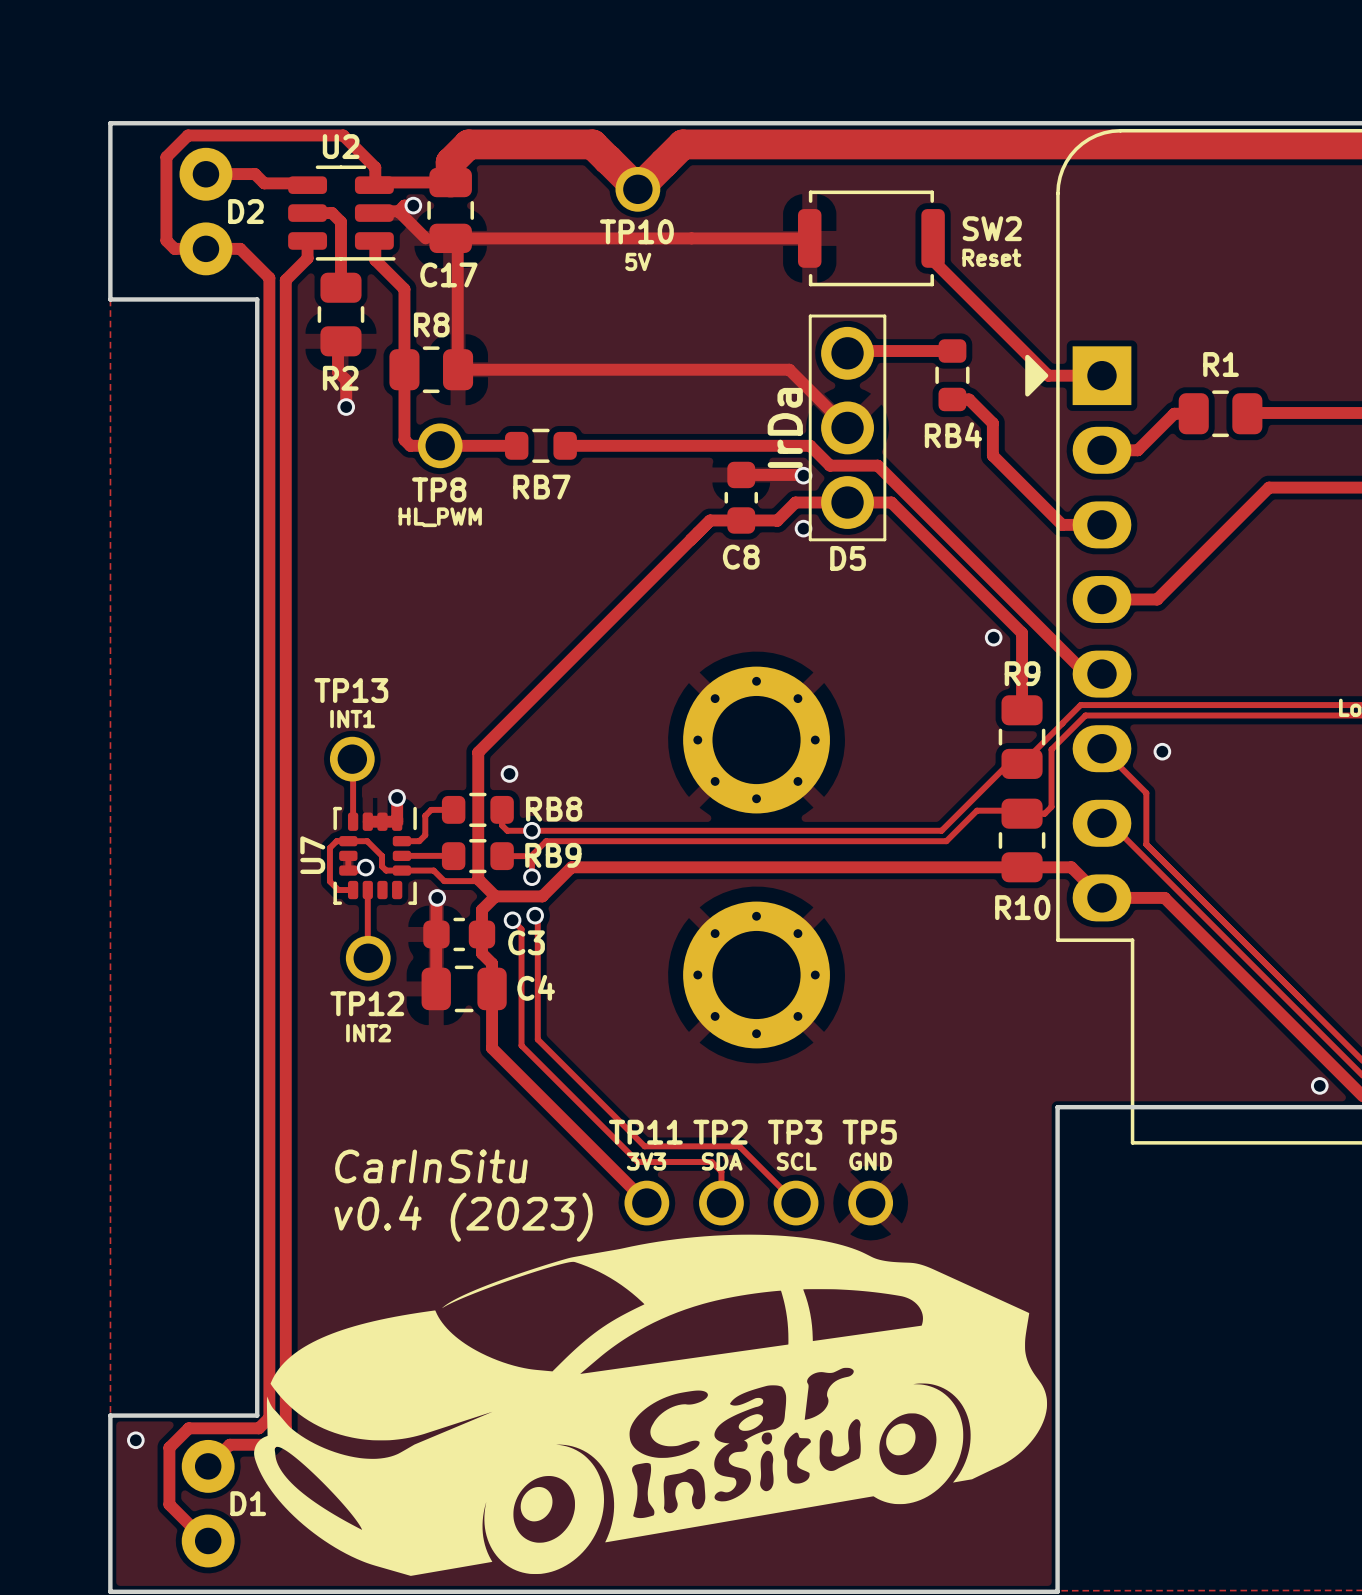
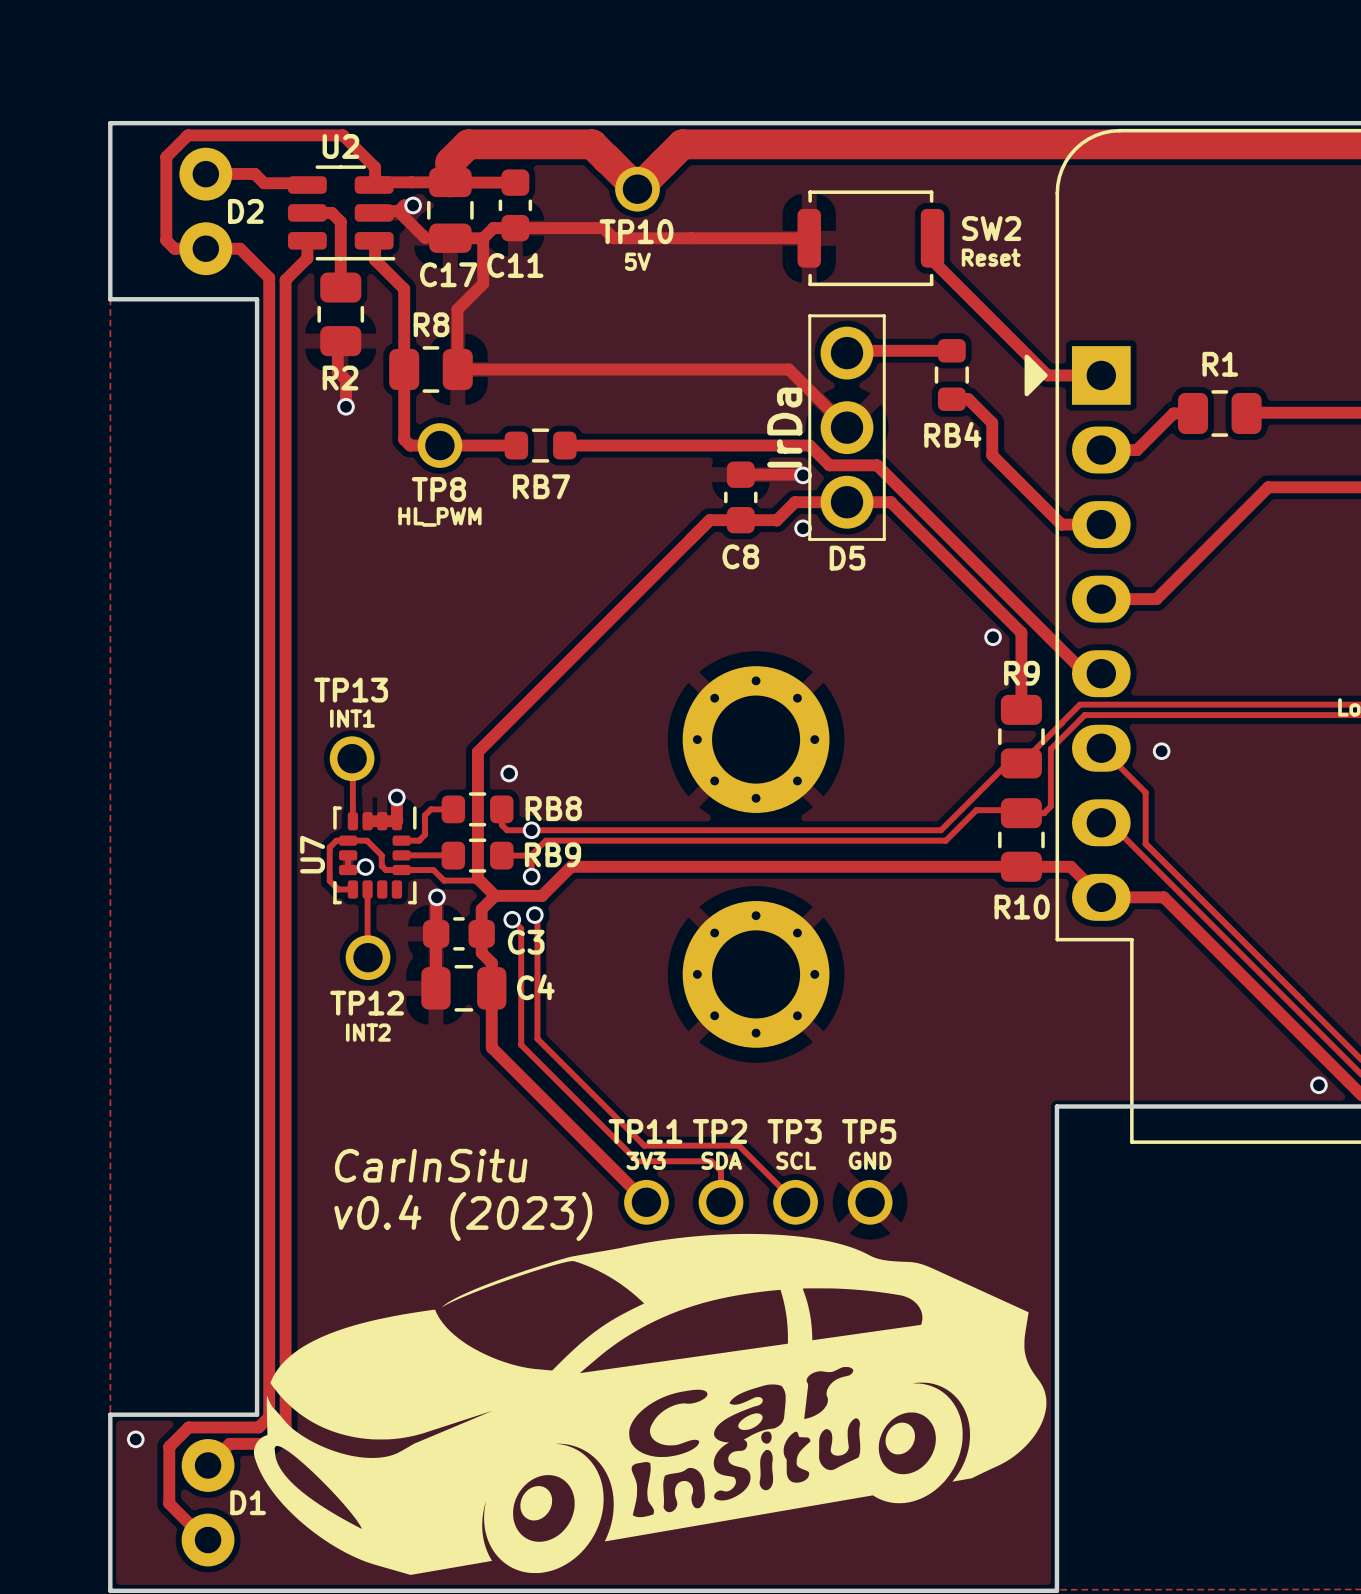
track: none -> (450, 182) (515, 182)
C11: none -> (515, 205)
track: (483, 238) (613, 238) -> (457, 309) (483, 283) (483, 238) (493, 228) (603, 228) (613, 238)
track: (457, 245) (457, 309) -> none

